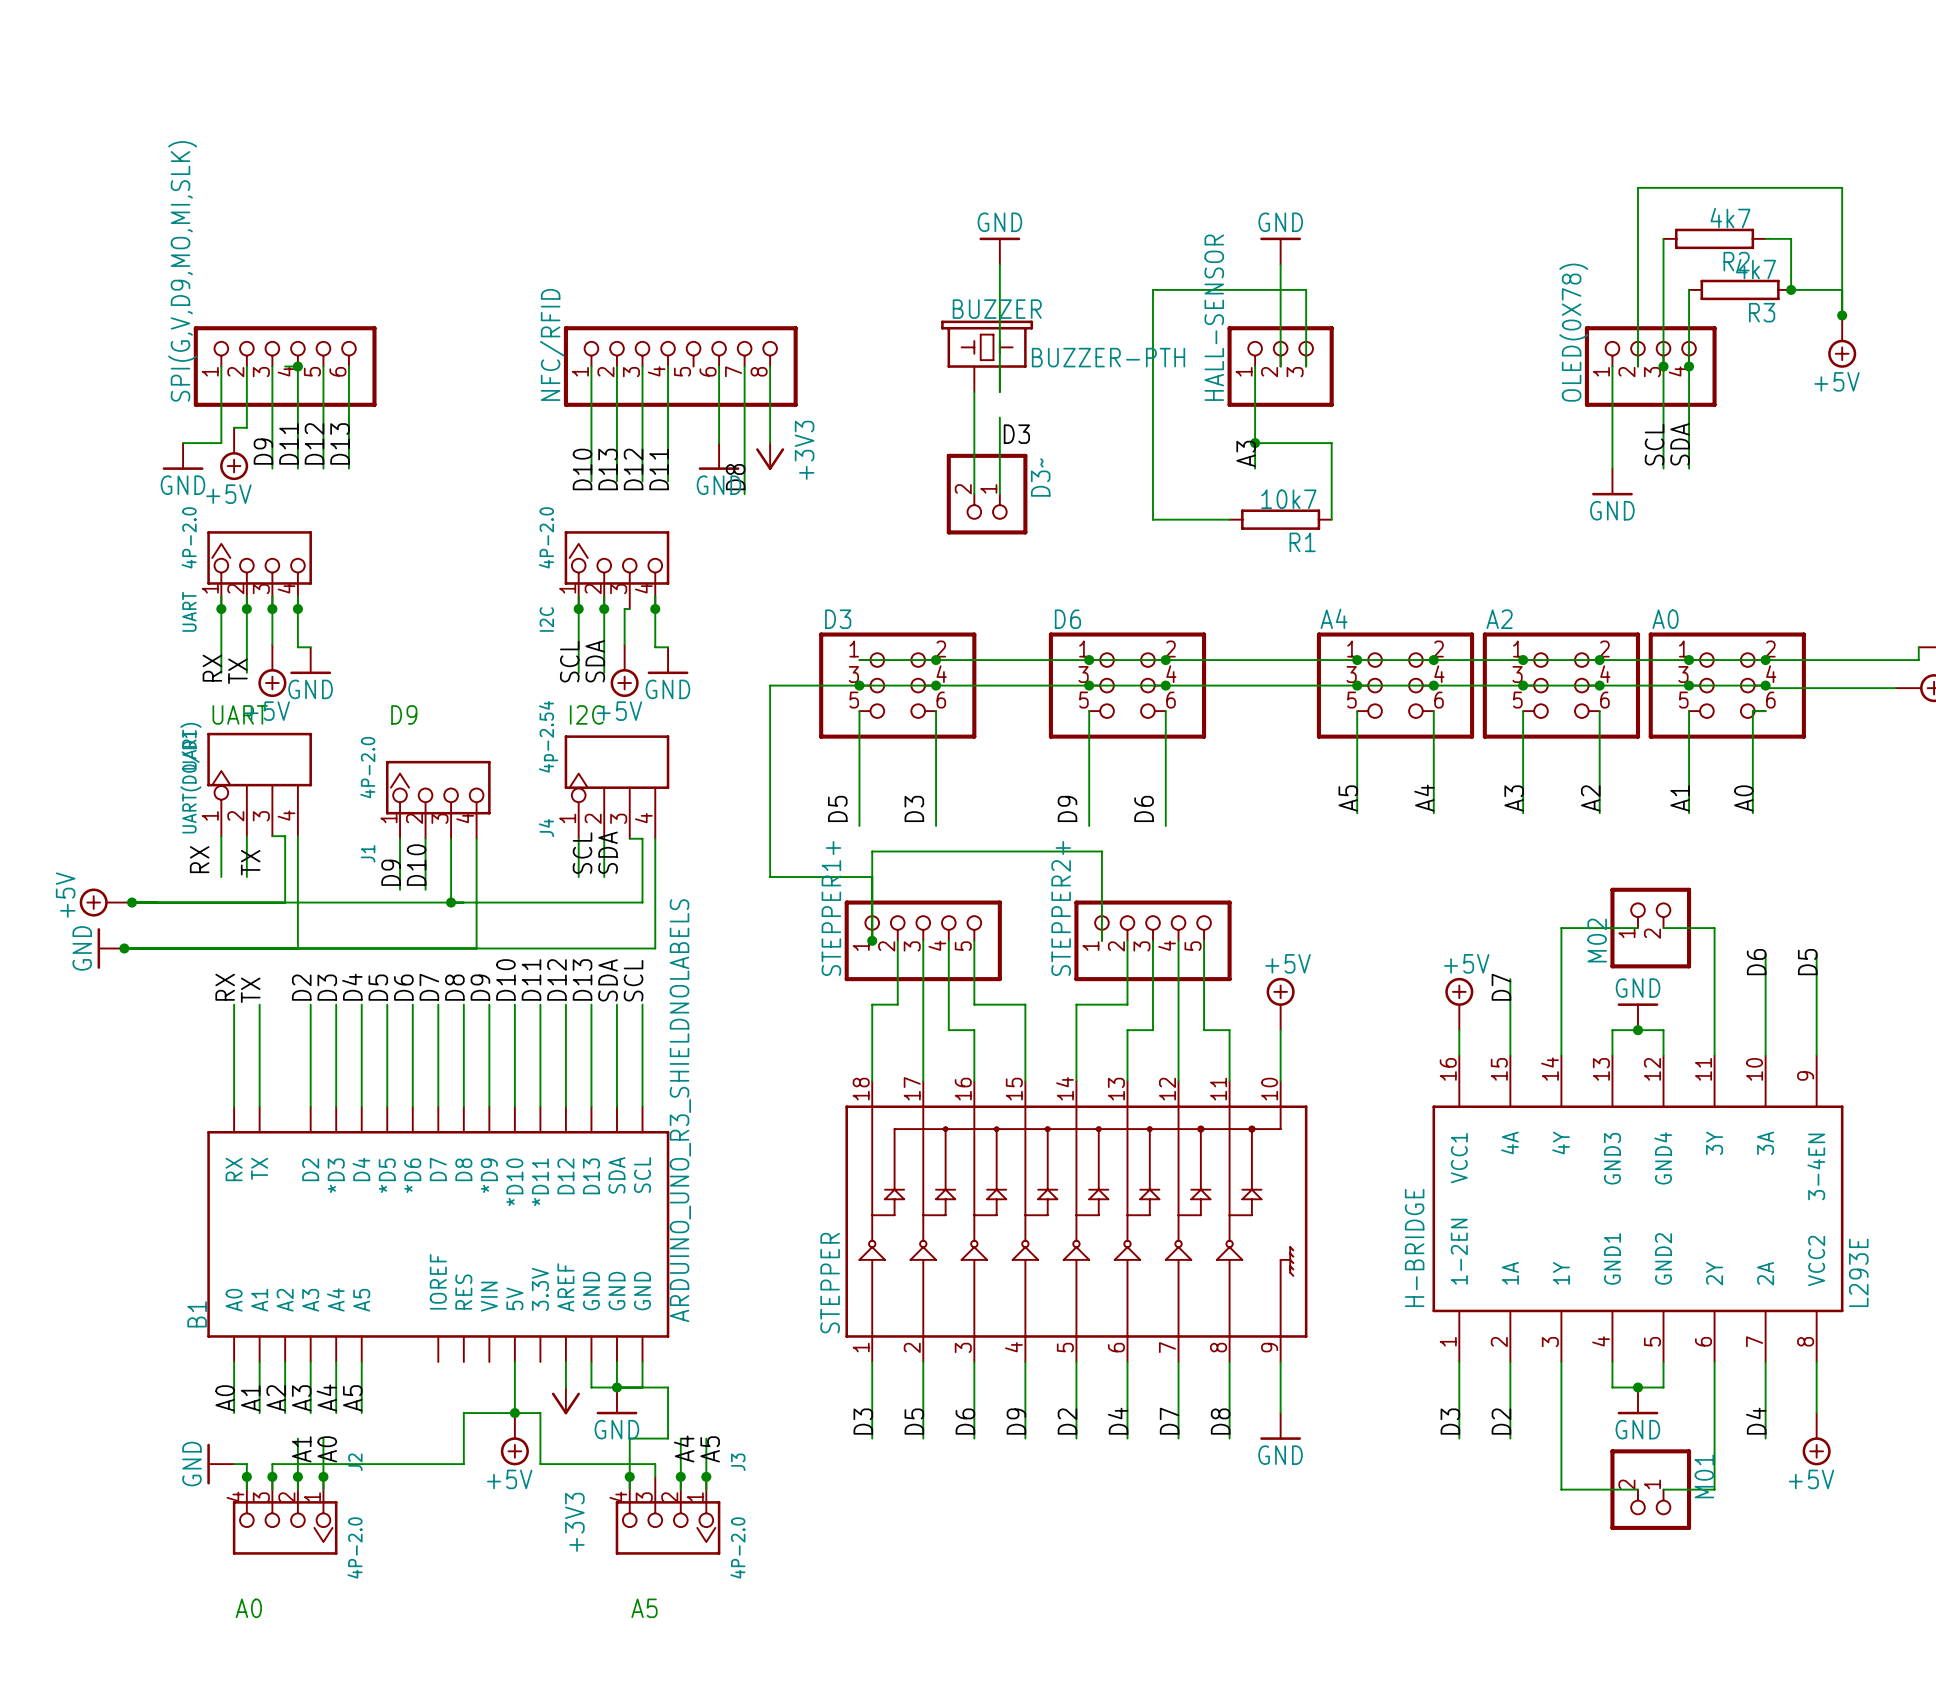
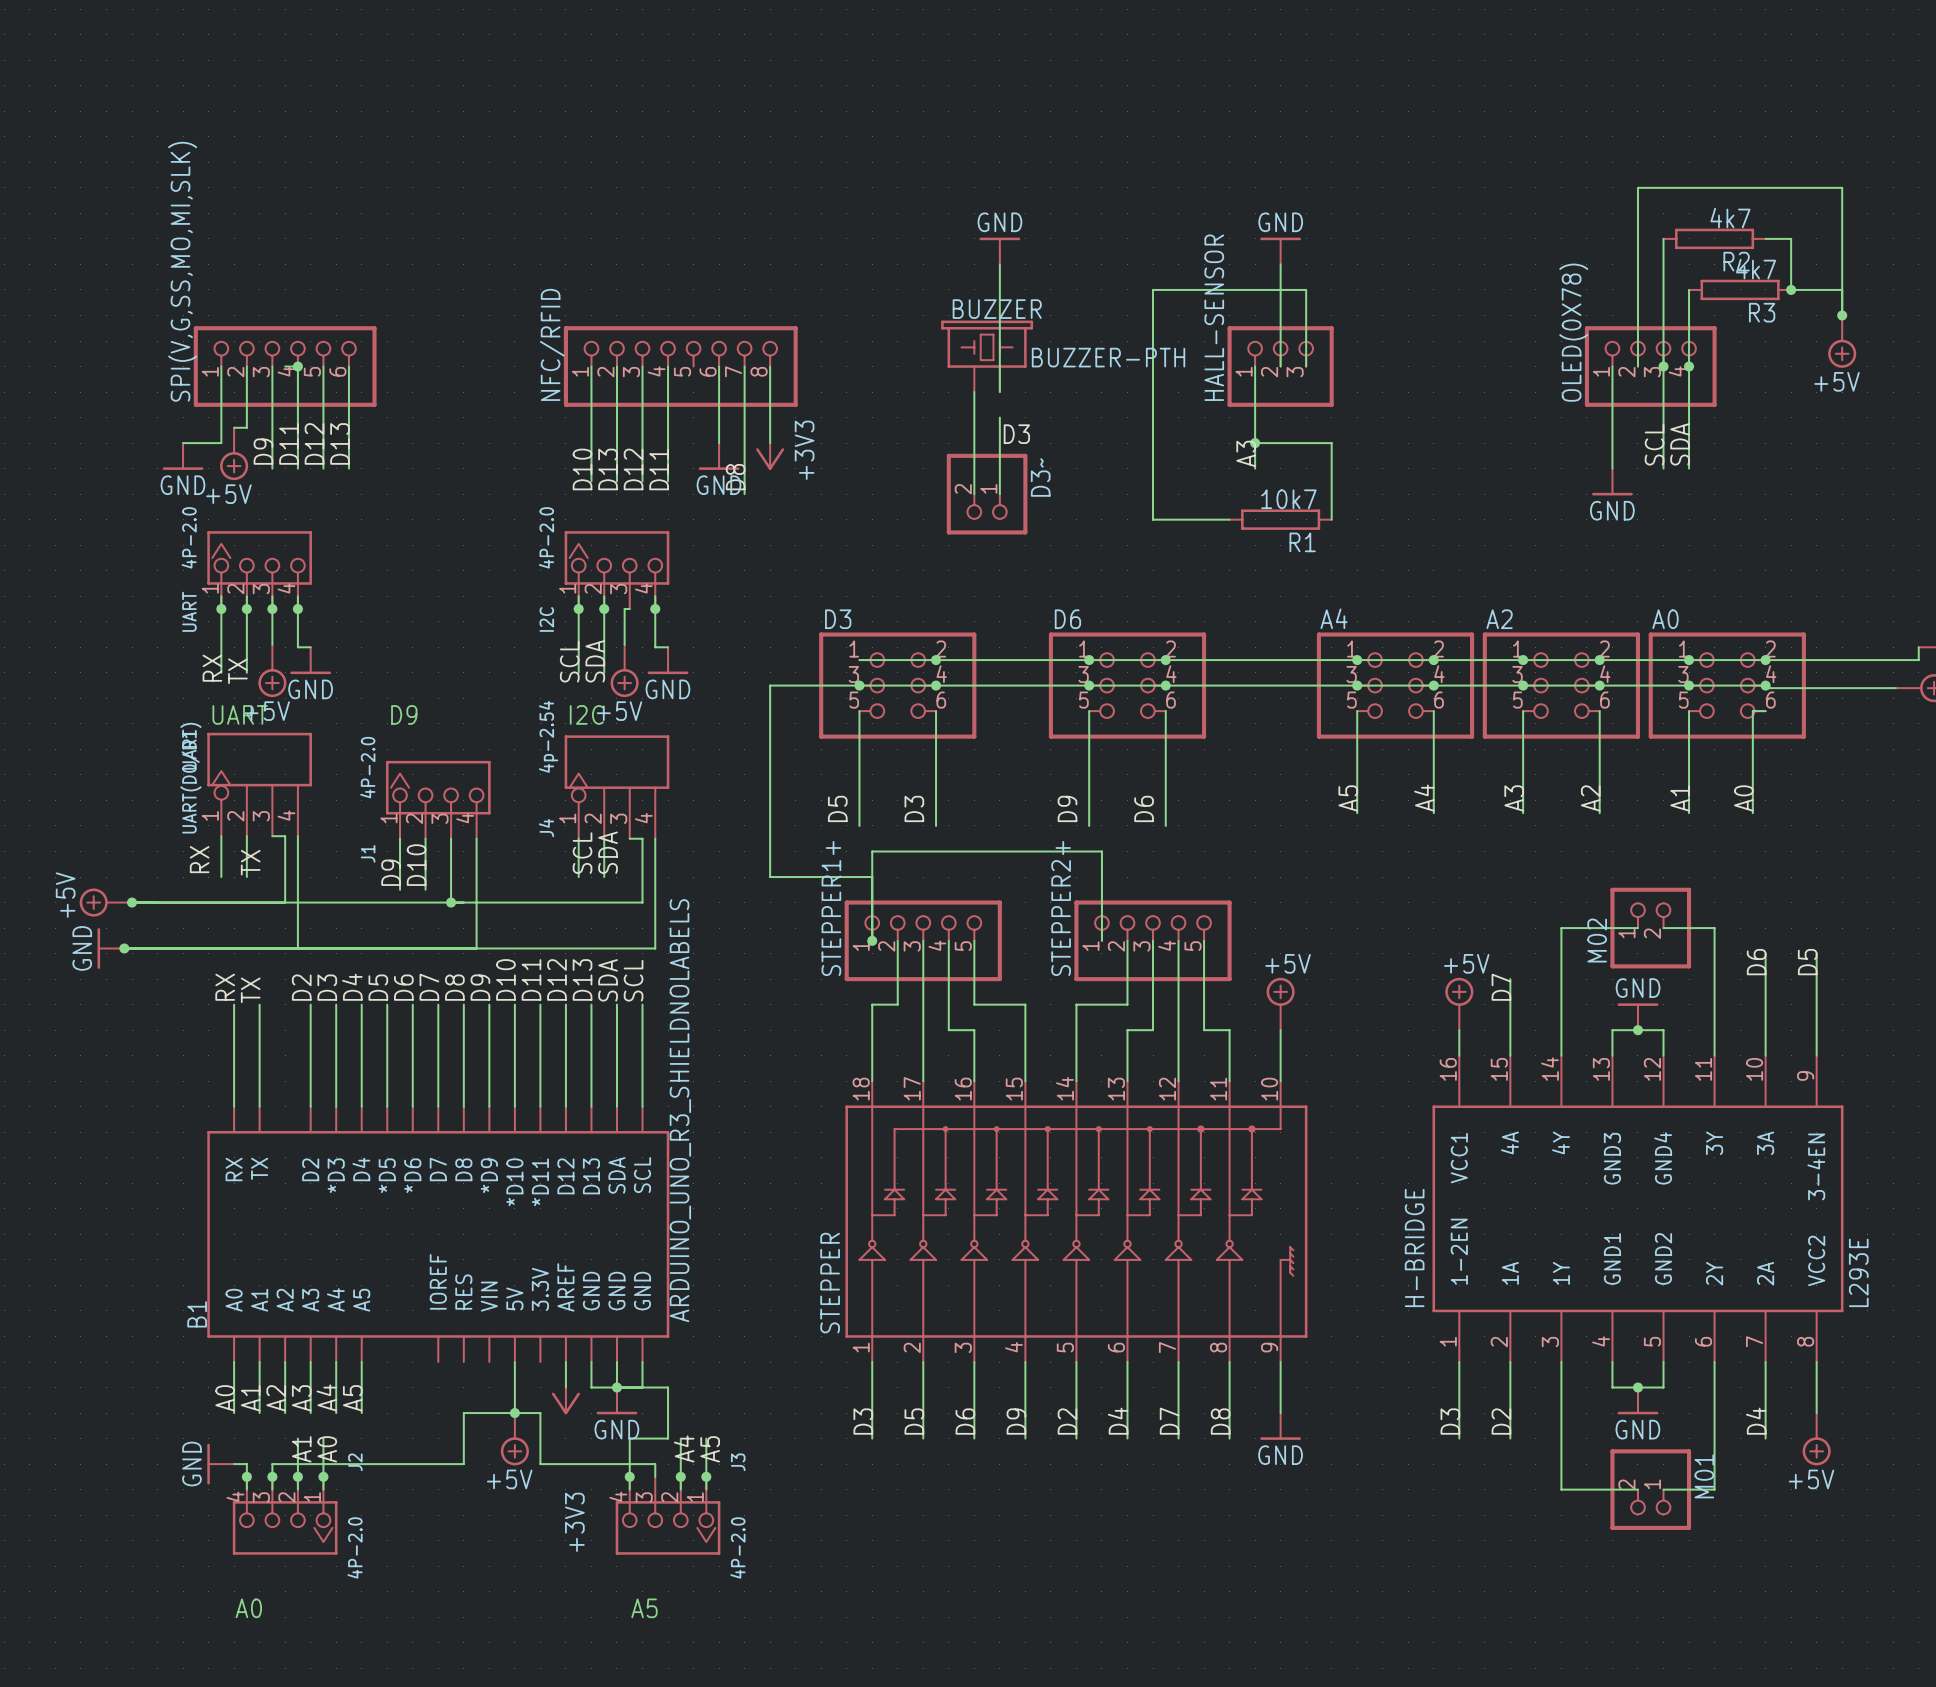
SPI(G,V,D9,MO,MI,SLK) name: SPI(G,V,D9,MO,MI,SLK) (182, 271) -> SPI(V,G,SS,MO,MI,SLK) (182, 271)

